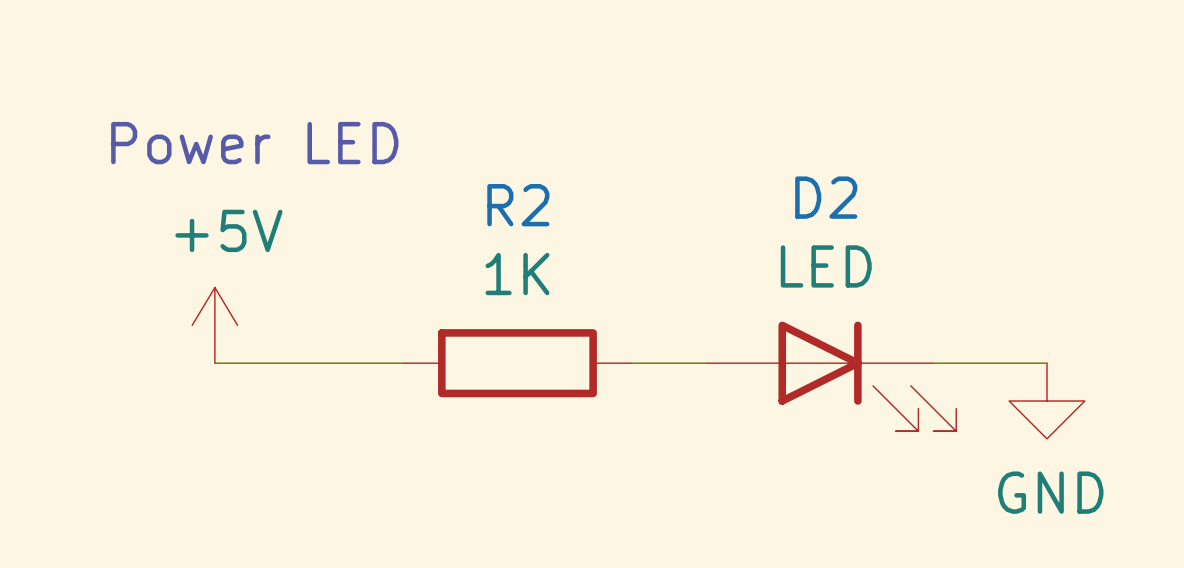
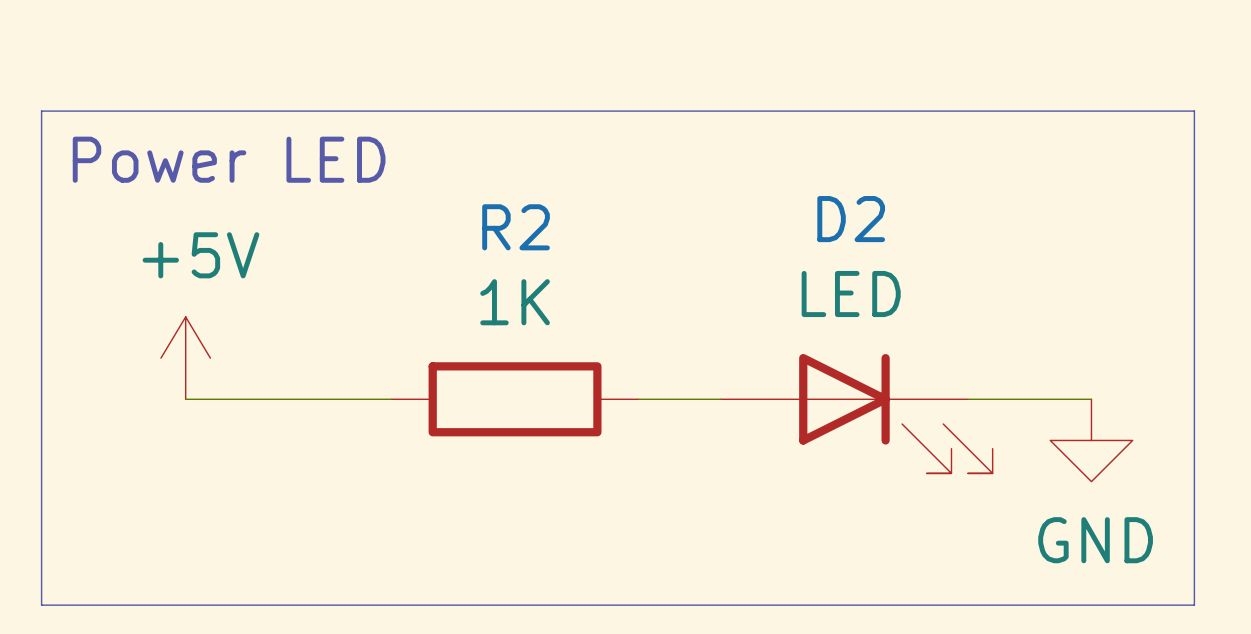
line: none -> (41, 111) (1194, 111) (1194, 605) (41, 605) (41, 111)

